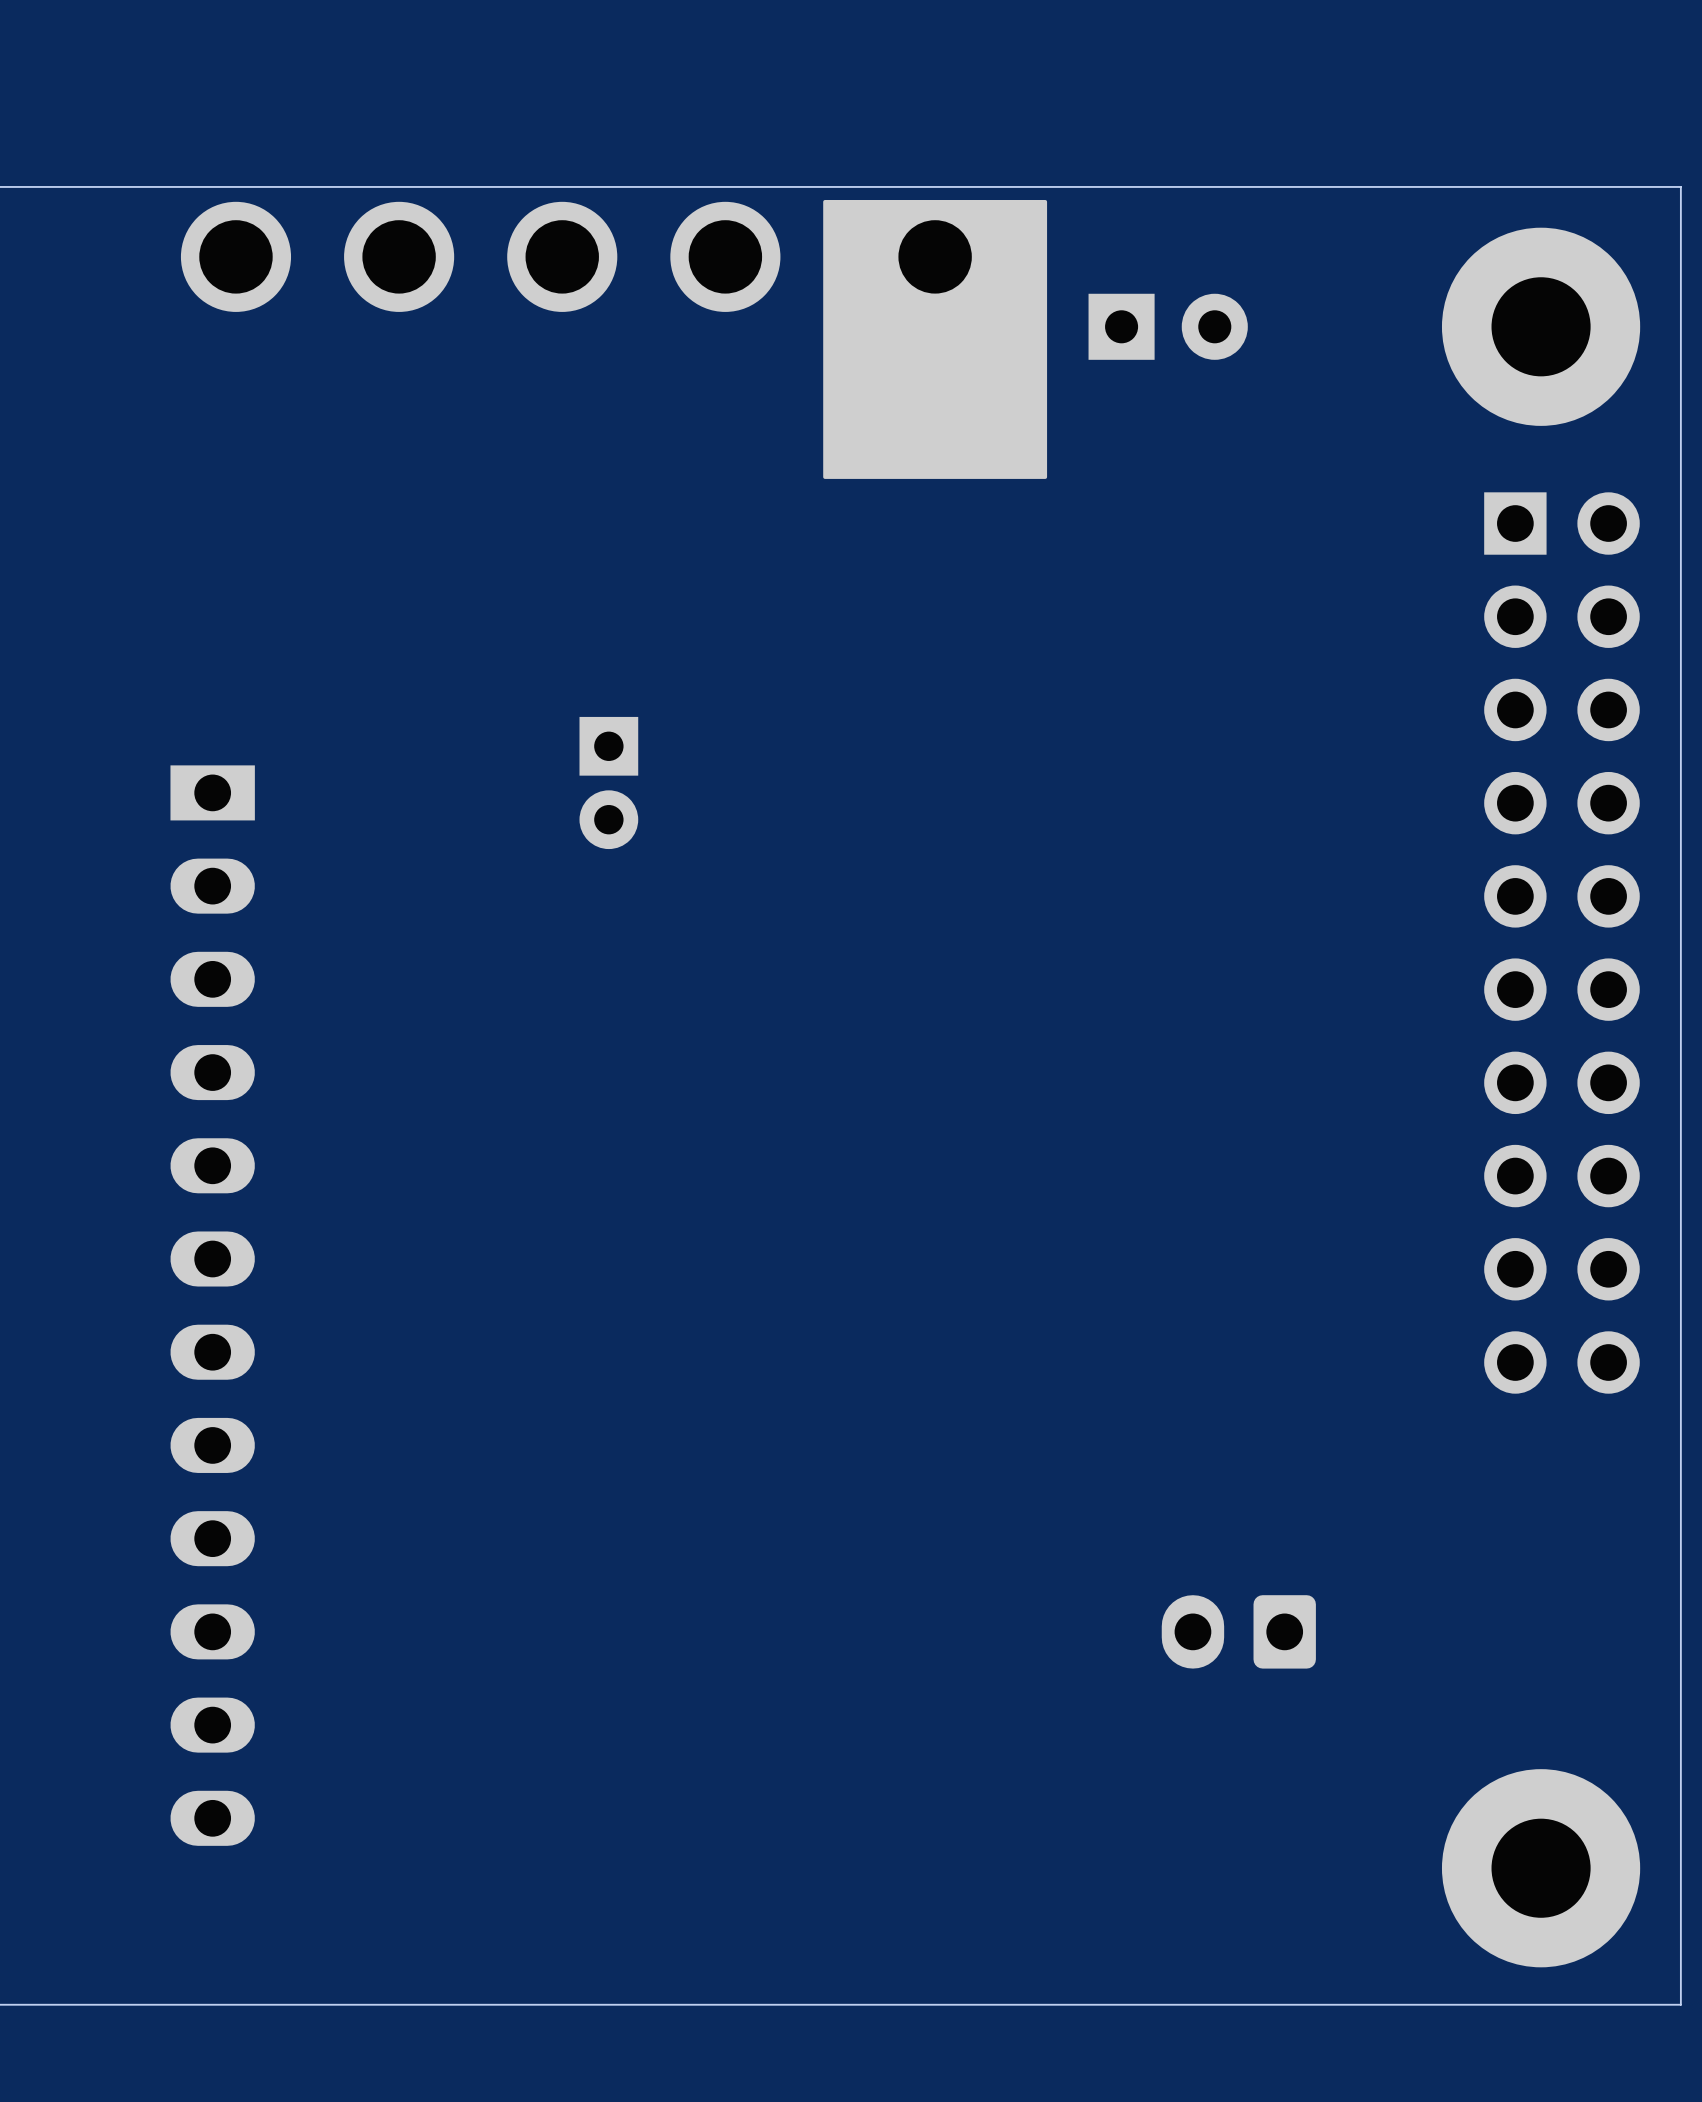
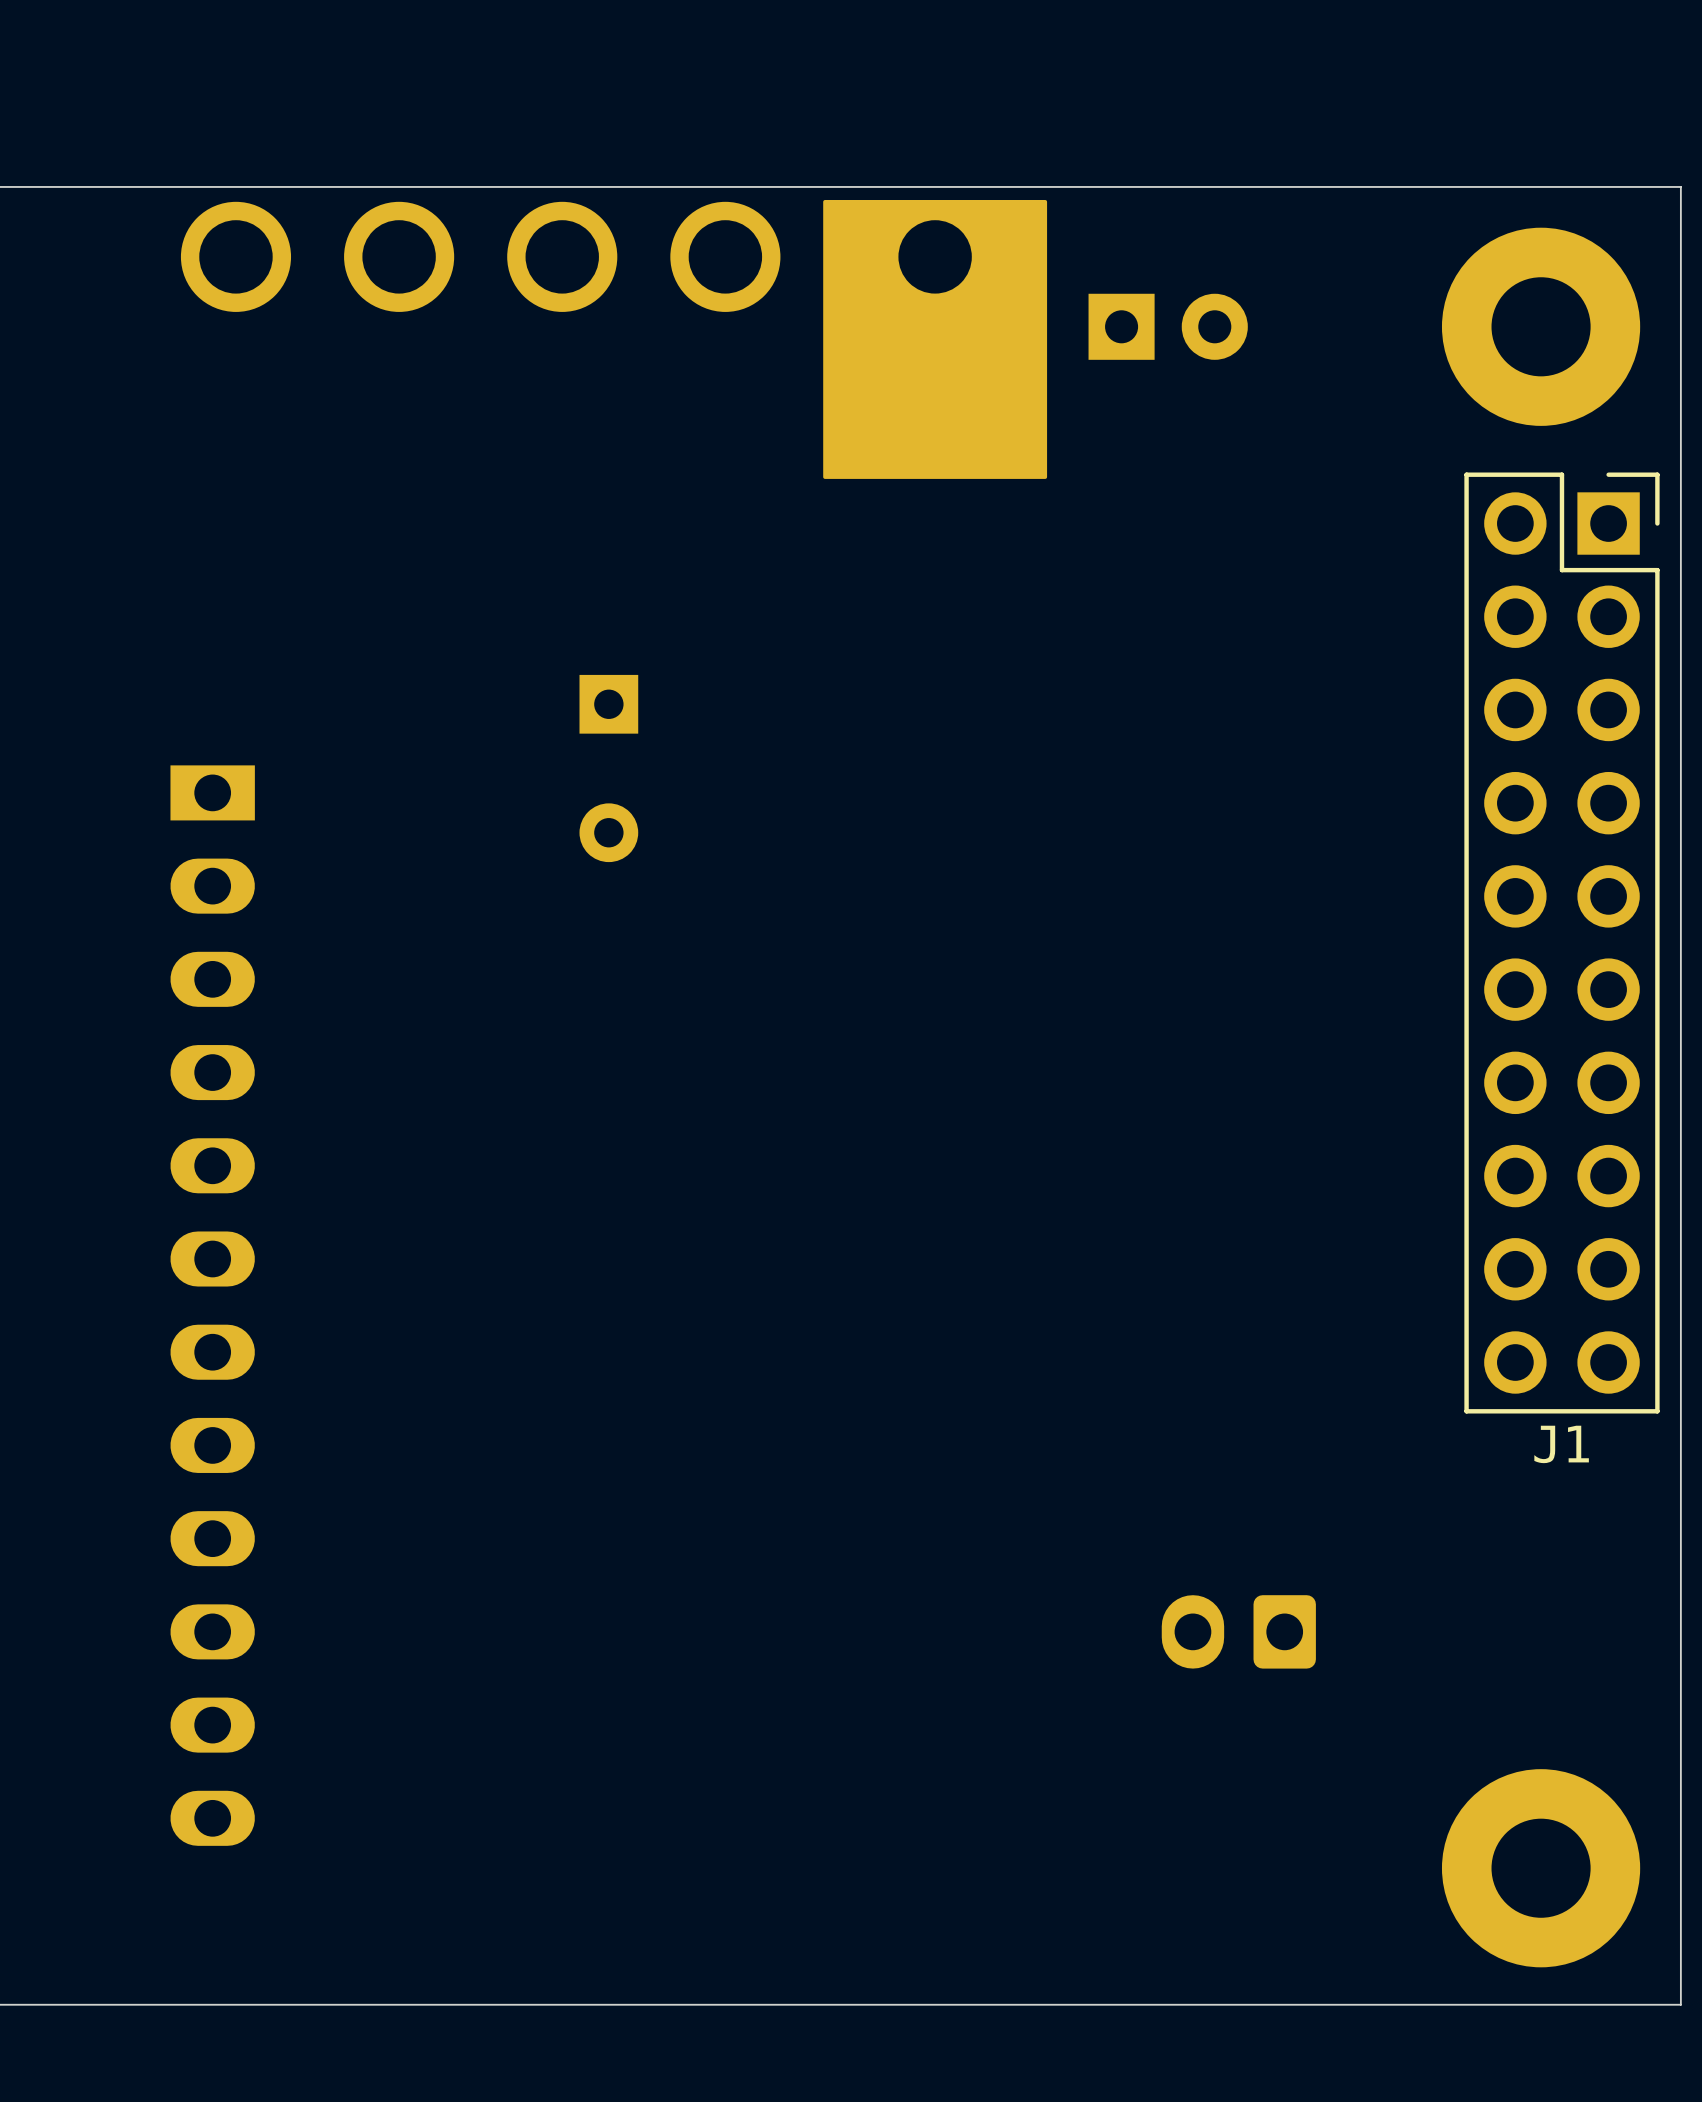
part footprint: [579, 716, 639, 850] -> [579, 674, 639, 863]
part: (1561, 943) -> none
J1: none -> (1561, 943)

